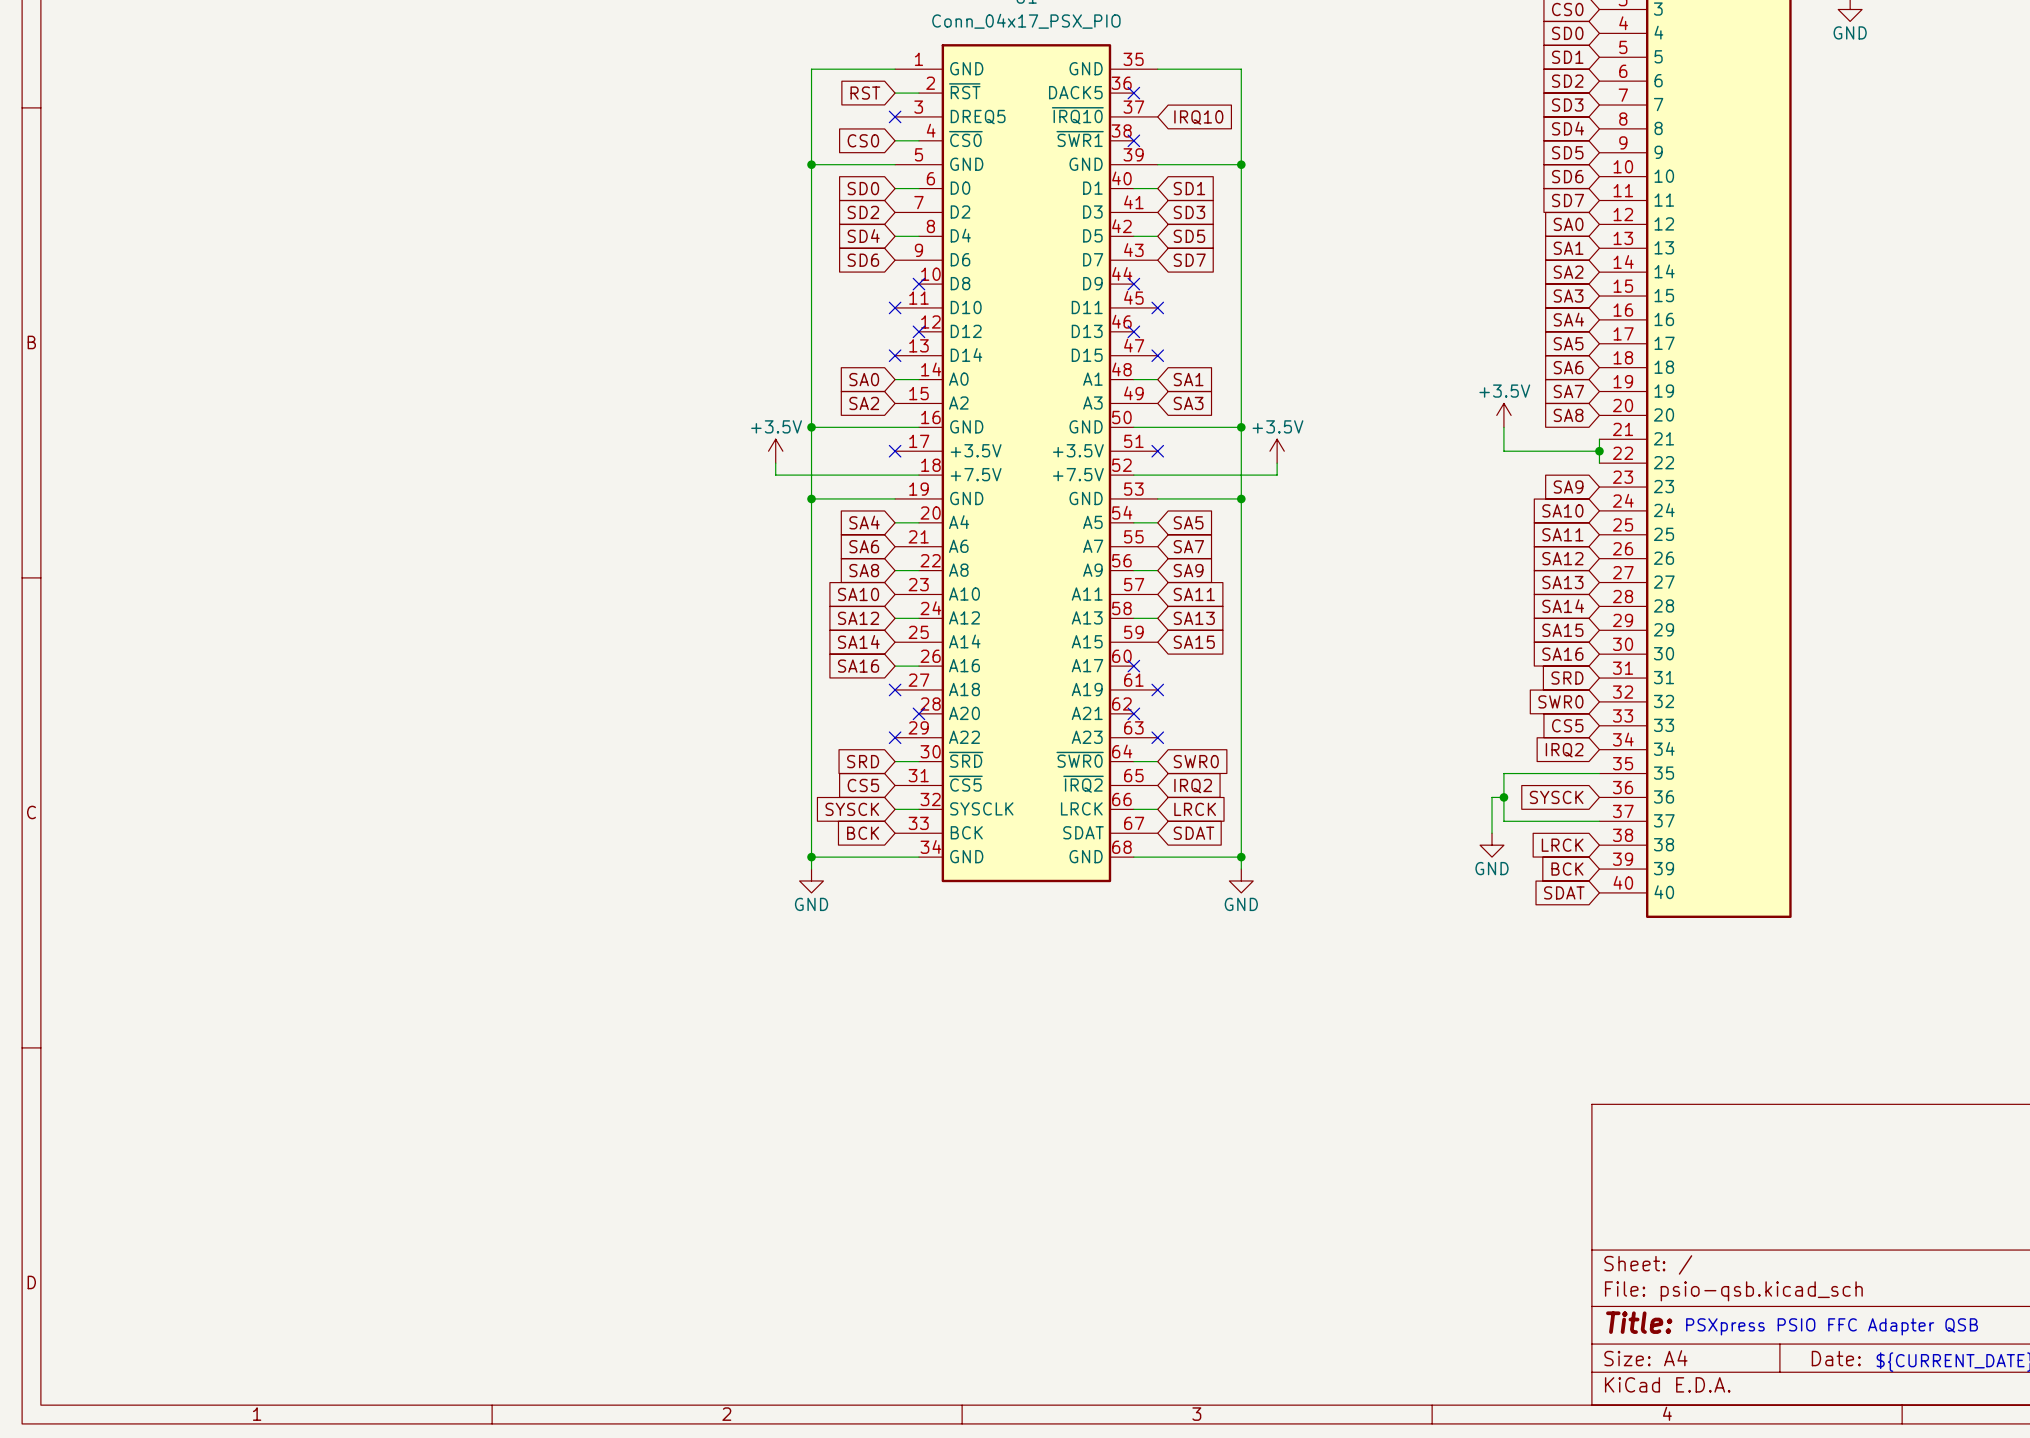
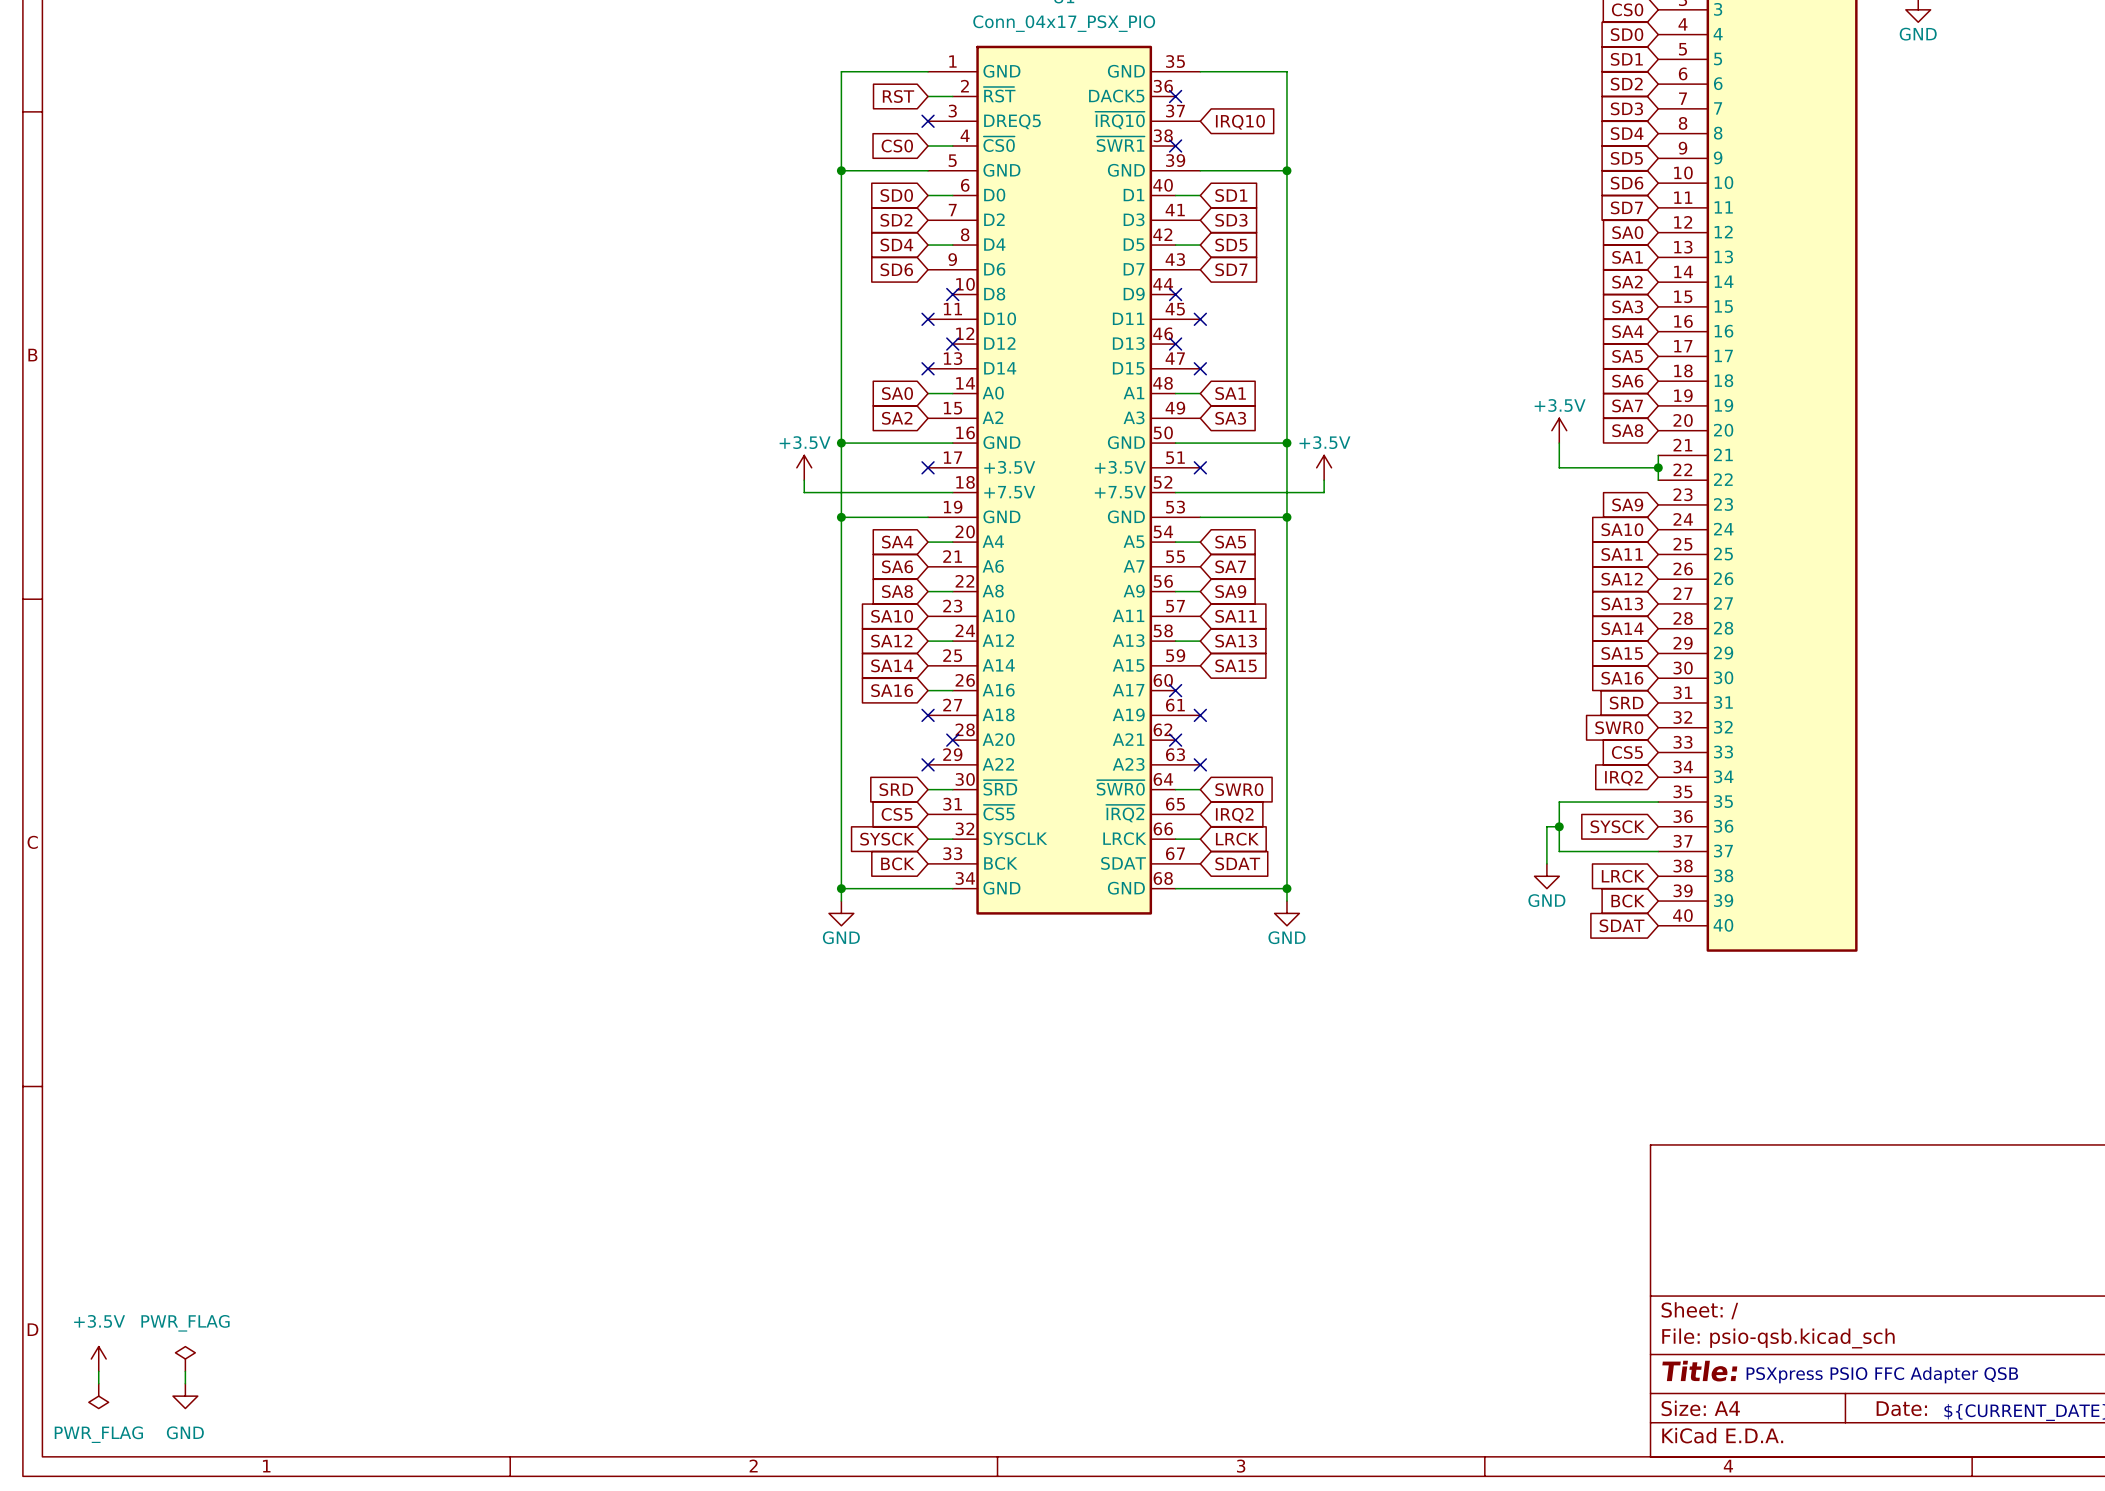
power symbol: none -> +3.5V (98, 1359)
power symbol: none -> PWR_FLAG (185, 1359)
wire: none -> (98, 1371) (98, 1383)
wire: none -> (185, 1371) (185, 1383)
power symbol: none -> PWR_FLAG (98, 1396)
power symbol: none -> GND (185, 1396)

